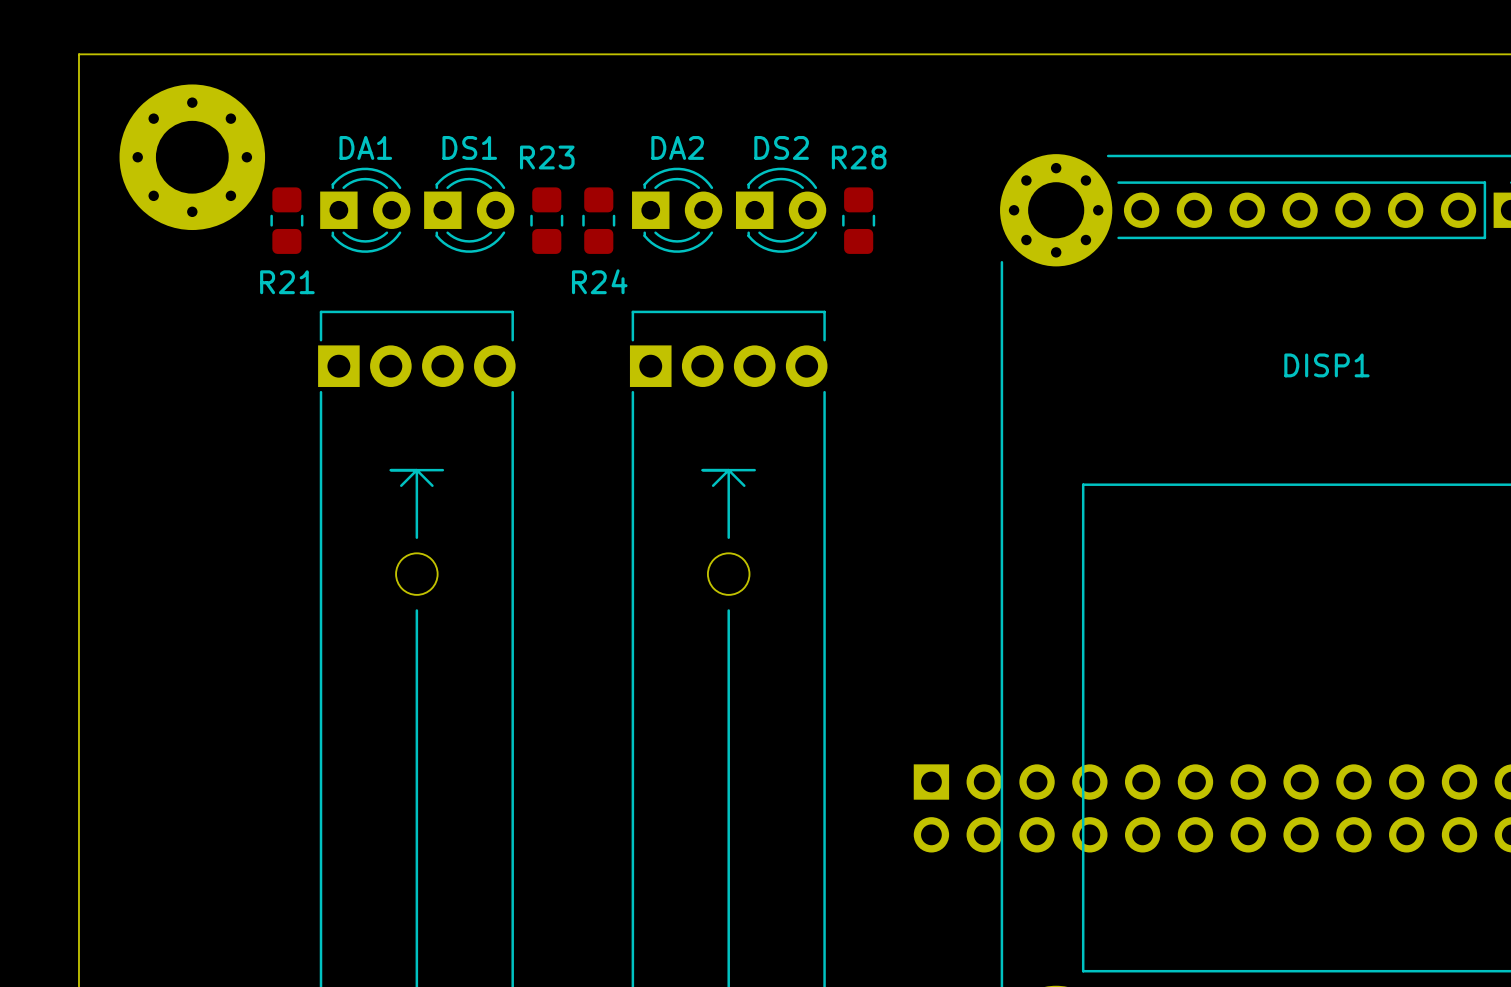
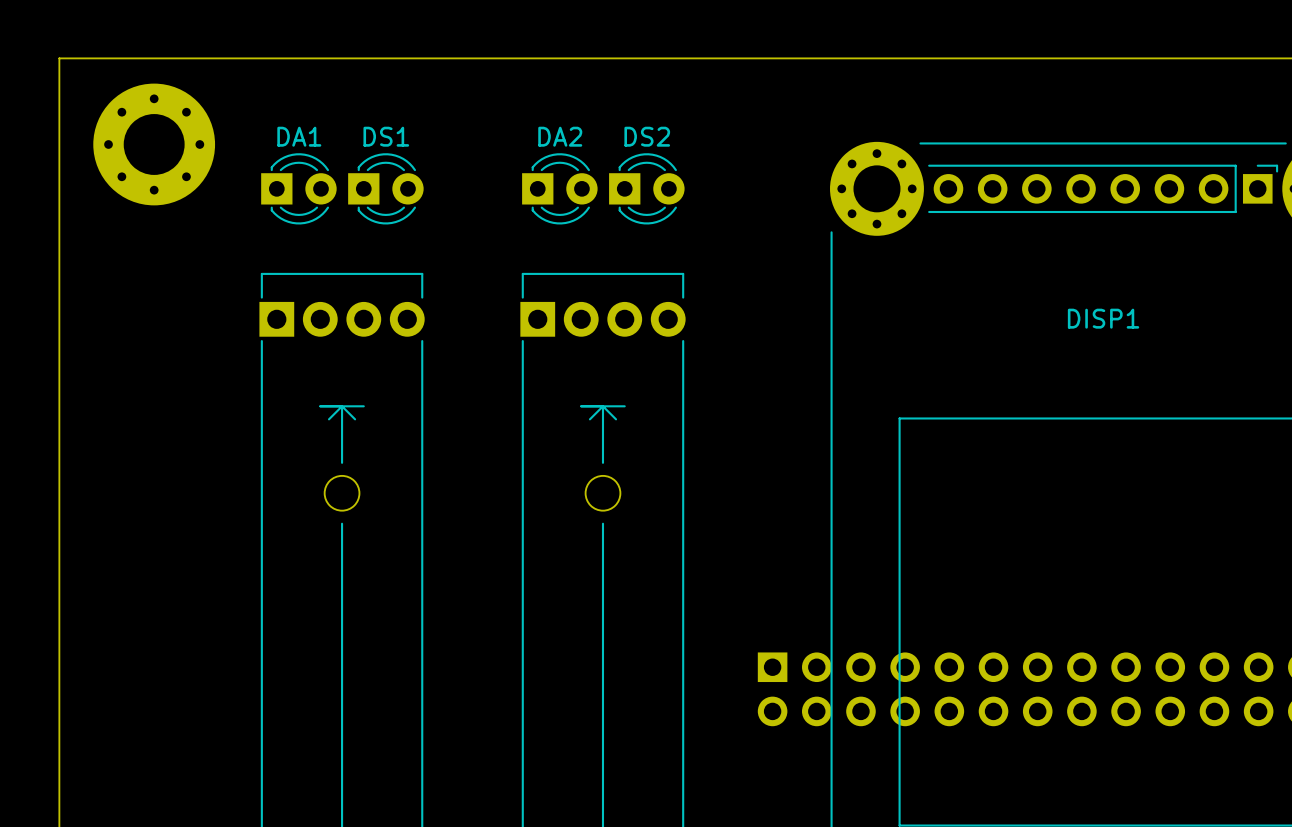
R21: (286, 220) -> none
R23: (546, 220) -> none
R24: (598, 220) -> none
R28: (858, 220) -> none

